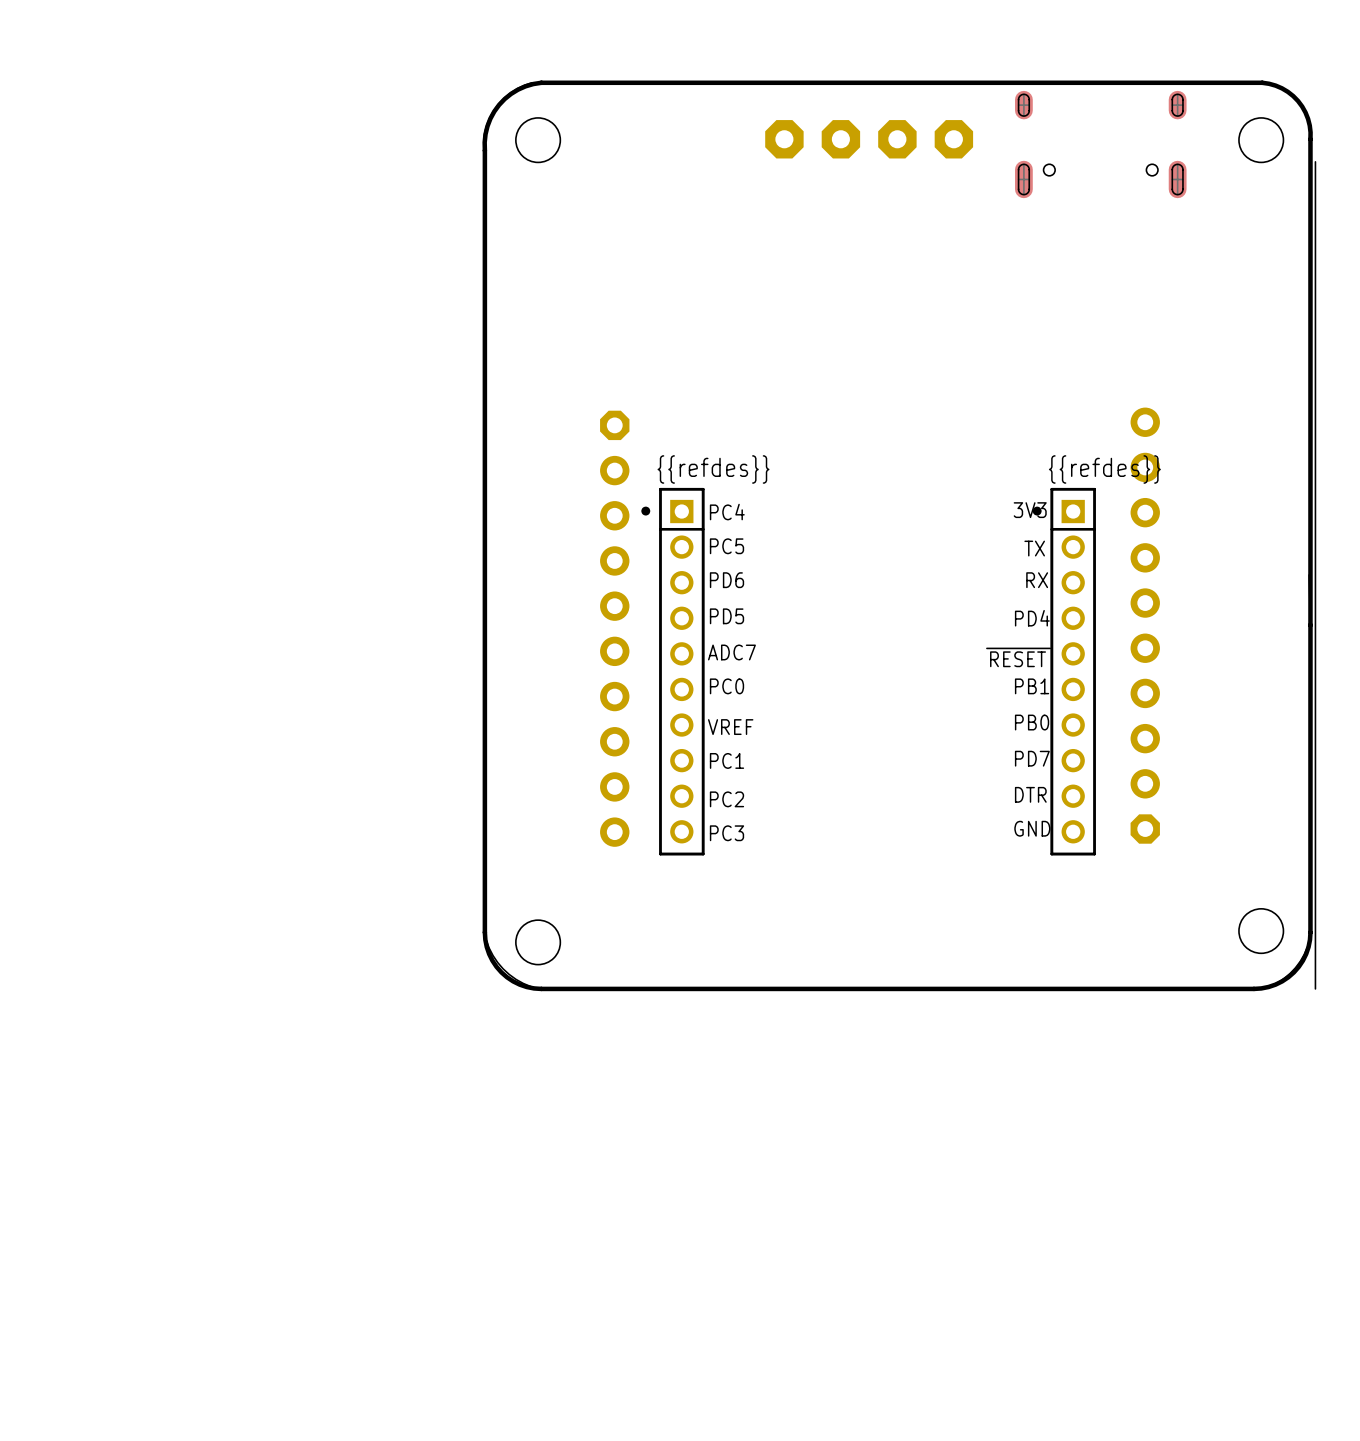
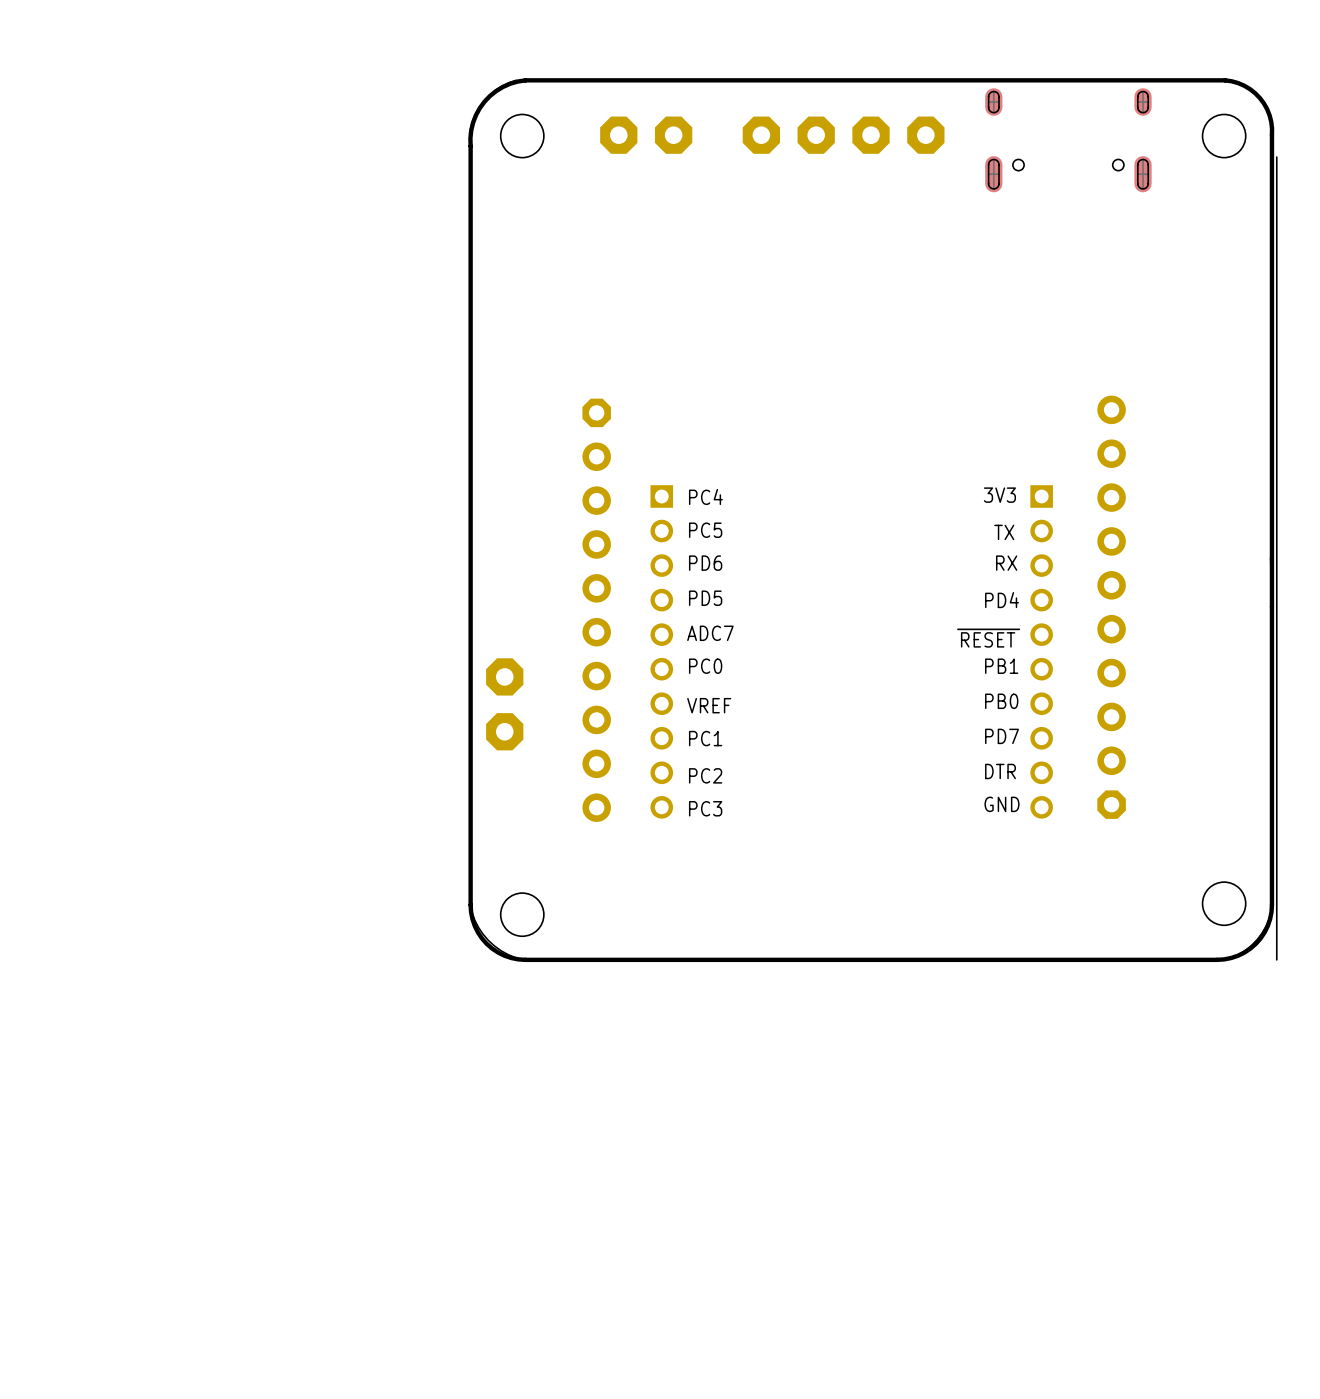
part: none -> (618, 135)
part: none -> (673, 135)
part side: top (672, 671) -> bottom (661, 651)
part side: top (1064, 671) -> bottom (1041, 651)
part: none -> (504, 676)
part: none -> (504, 731)

